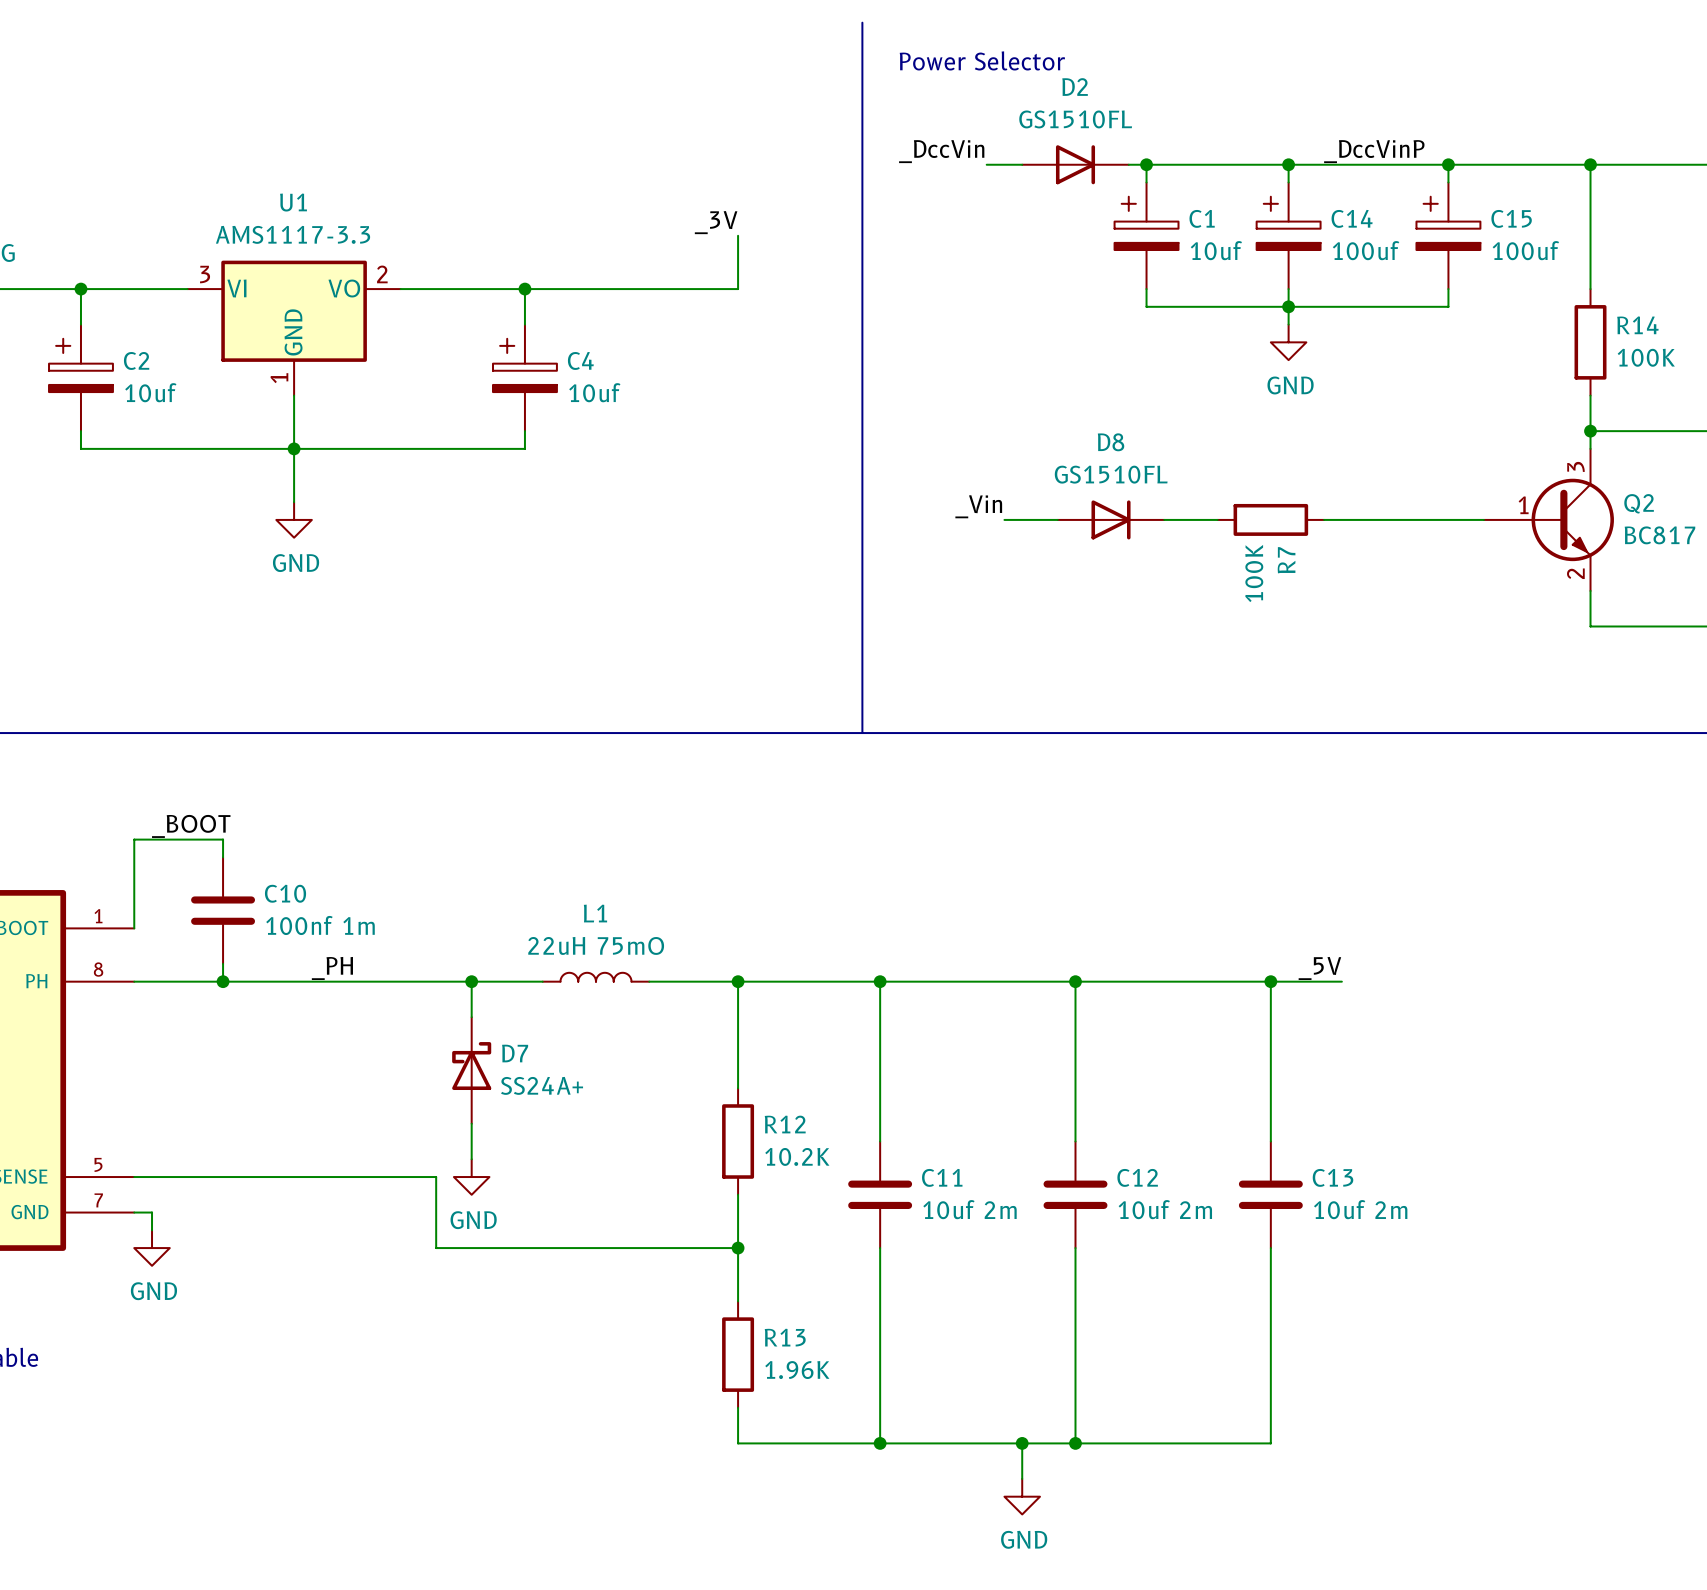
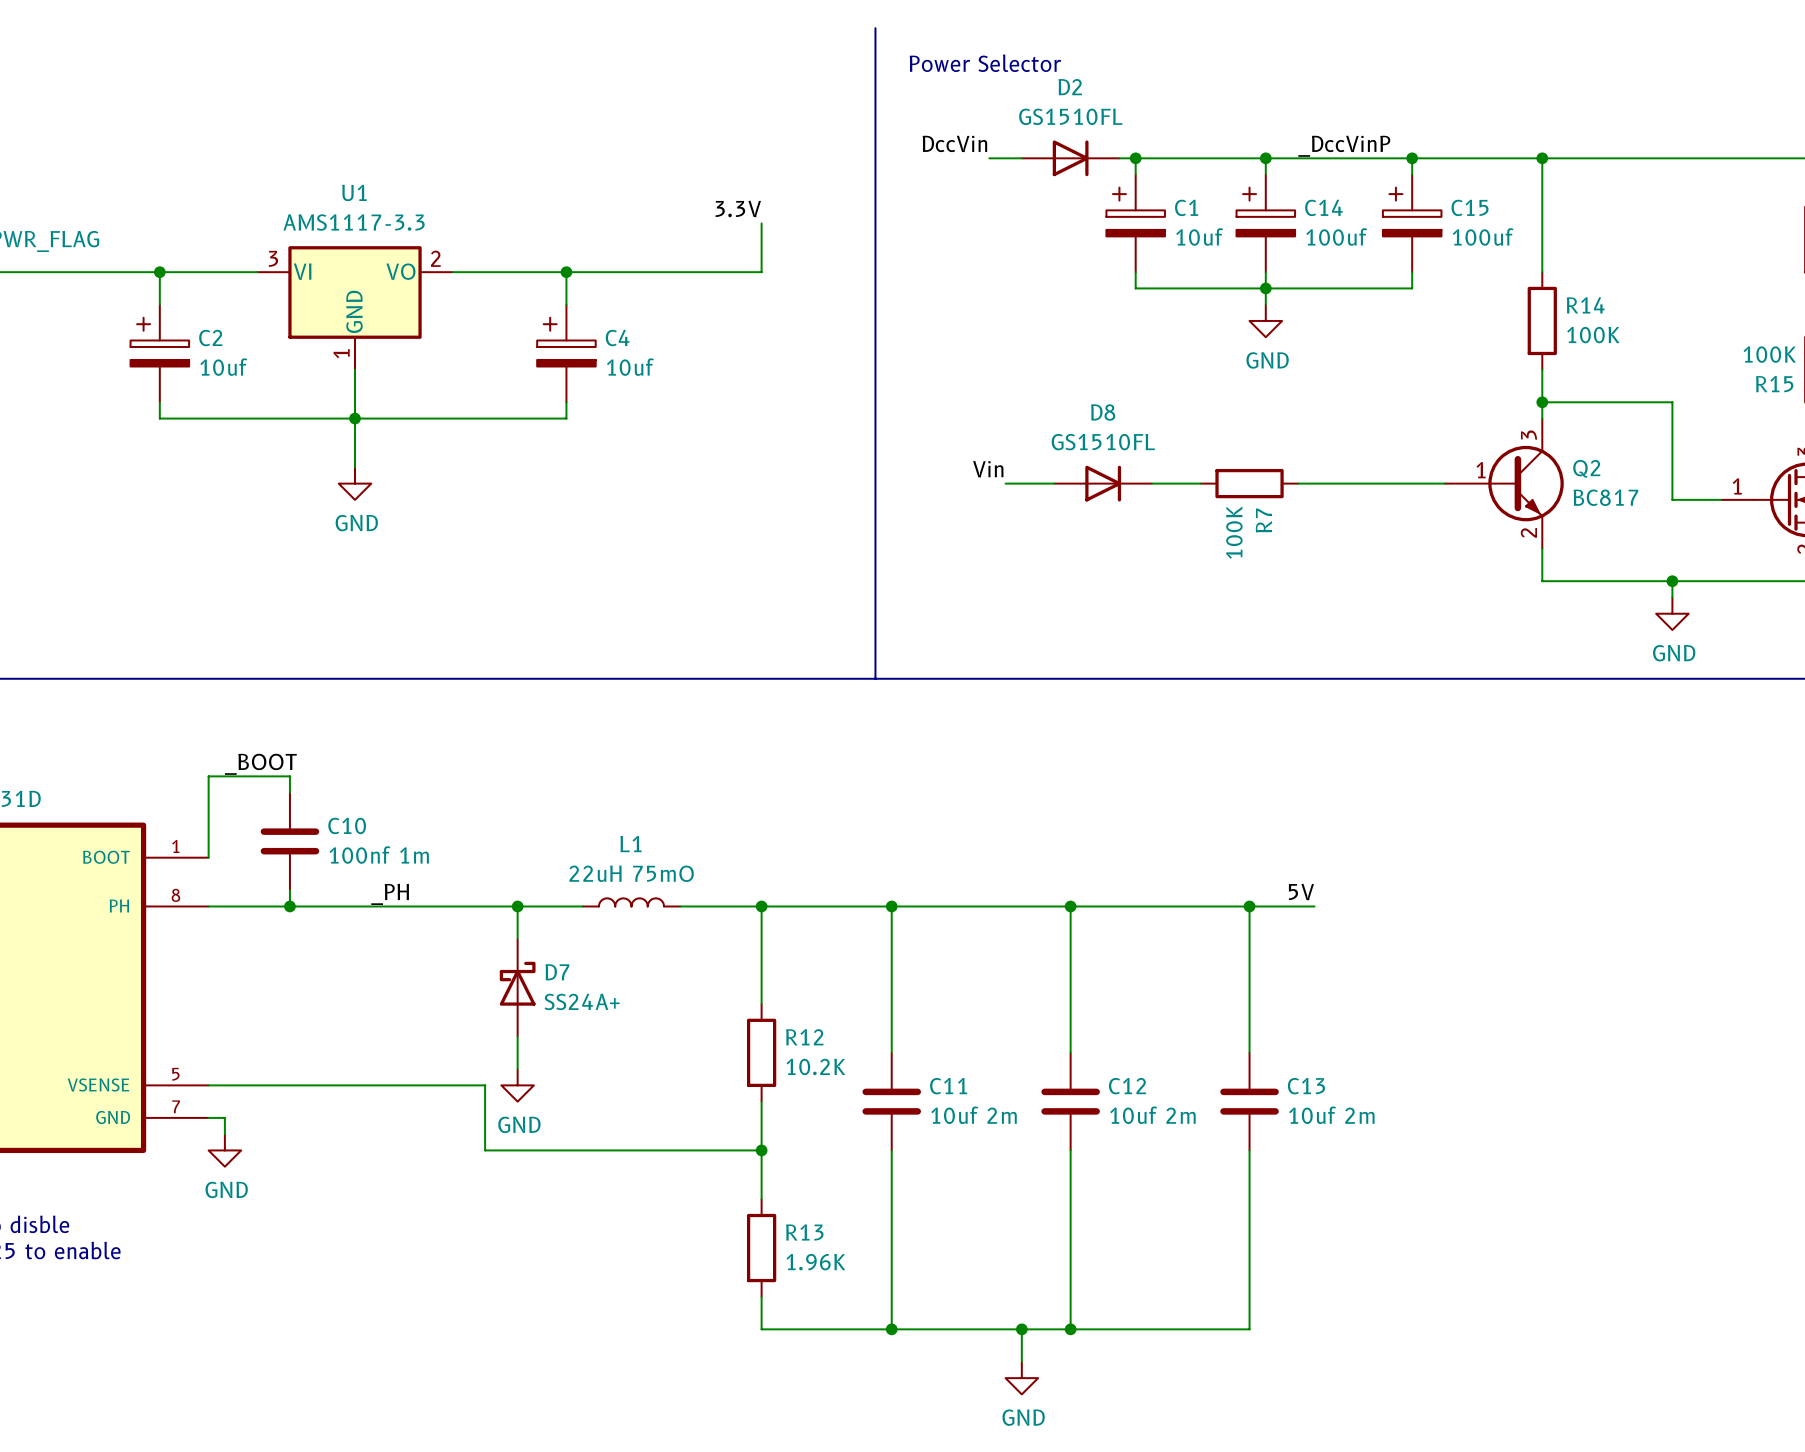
label: _DccVin (941, 151) -> DccVin (954, 143)
label: _3V (716, 222) -> 3.3V (738, 208)
label: _Vin (978, 506) -> Vin (988, 469)
label: _5V (1319, 968) -> 5V (1301, 892)

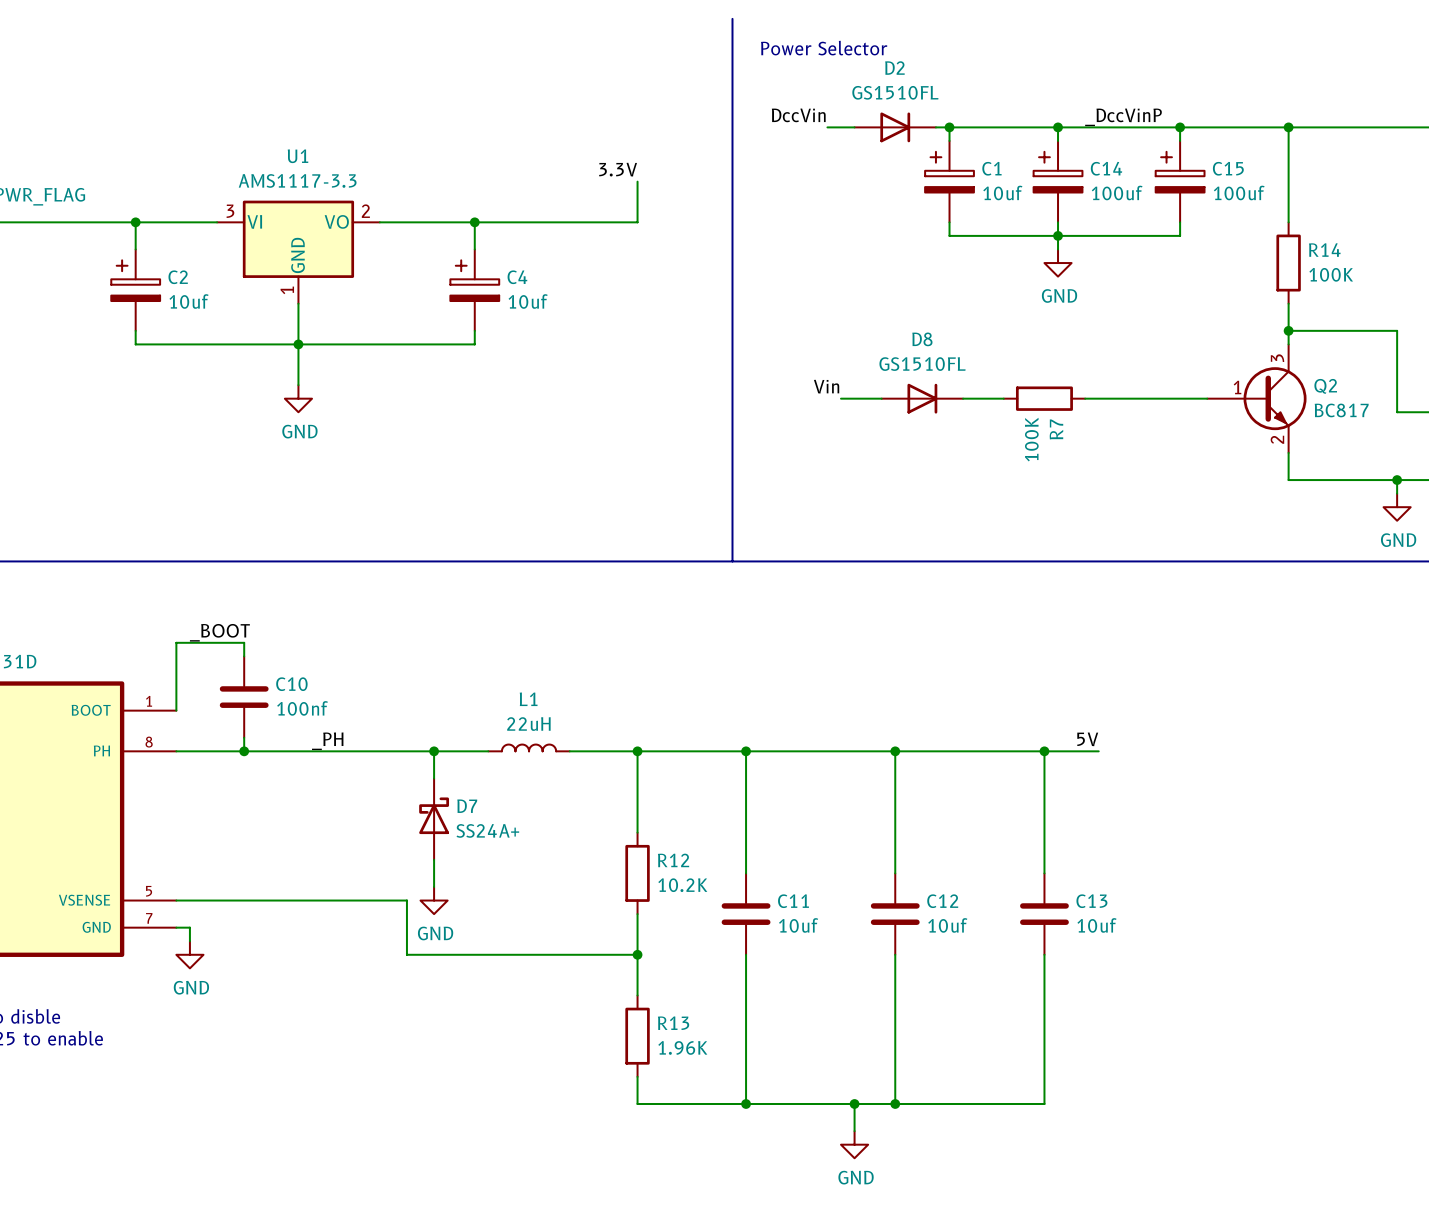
C10 value: 100nf 1m (379, 855) -> 100nf (302, 708)
L1 value: 22uH 75mO (631, 873) -> 22uH (528, 724)
C11 value: 10uf 2m (974, 1115) -> 10uf (798, 925)
C12 value: 10uf 2m (1152, 1115) -> 10uf (947, 925)
C13 value: 10uf 2m (1331, 1115) -> 10uf (1097, 925)

